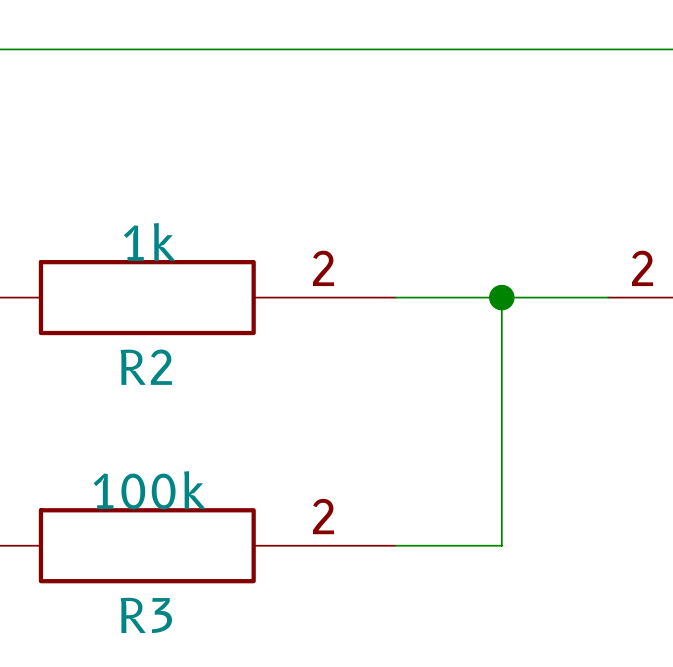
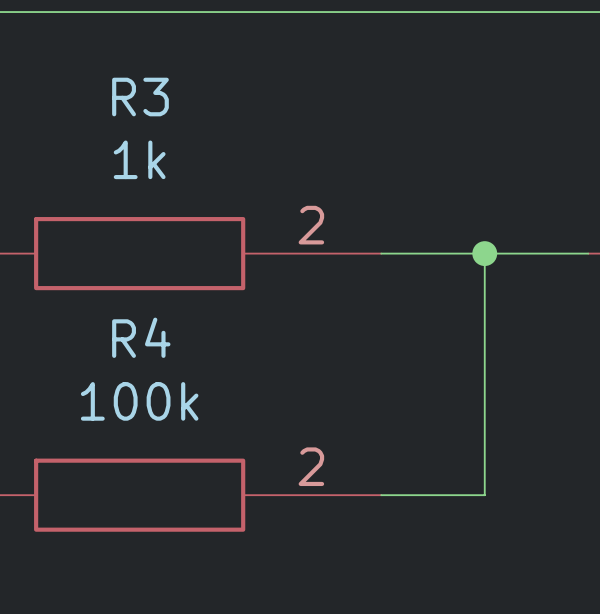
R2 value position: 1k (149, 241) -> 1k (139, 159)
R2 name: R2 (146, 367) -> R3 (140, 97)
R3 value position: 100k (149, 490) -> 100k (139, 401)
R3 name: R3 (146, 615) -> R4 (141, 337)

